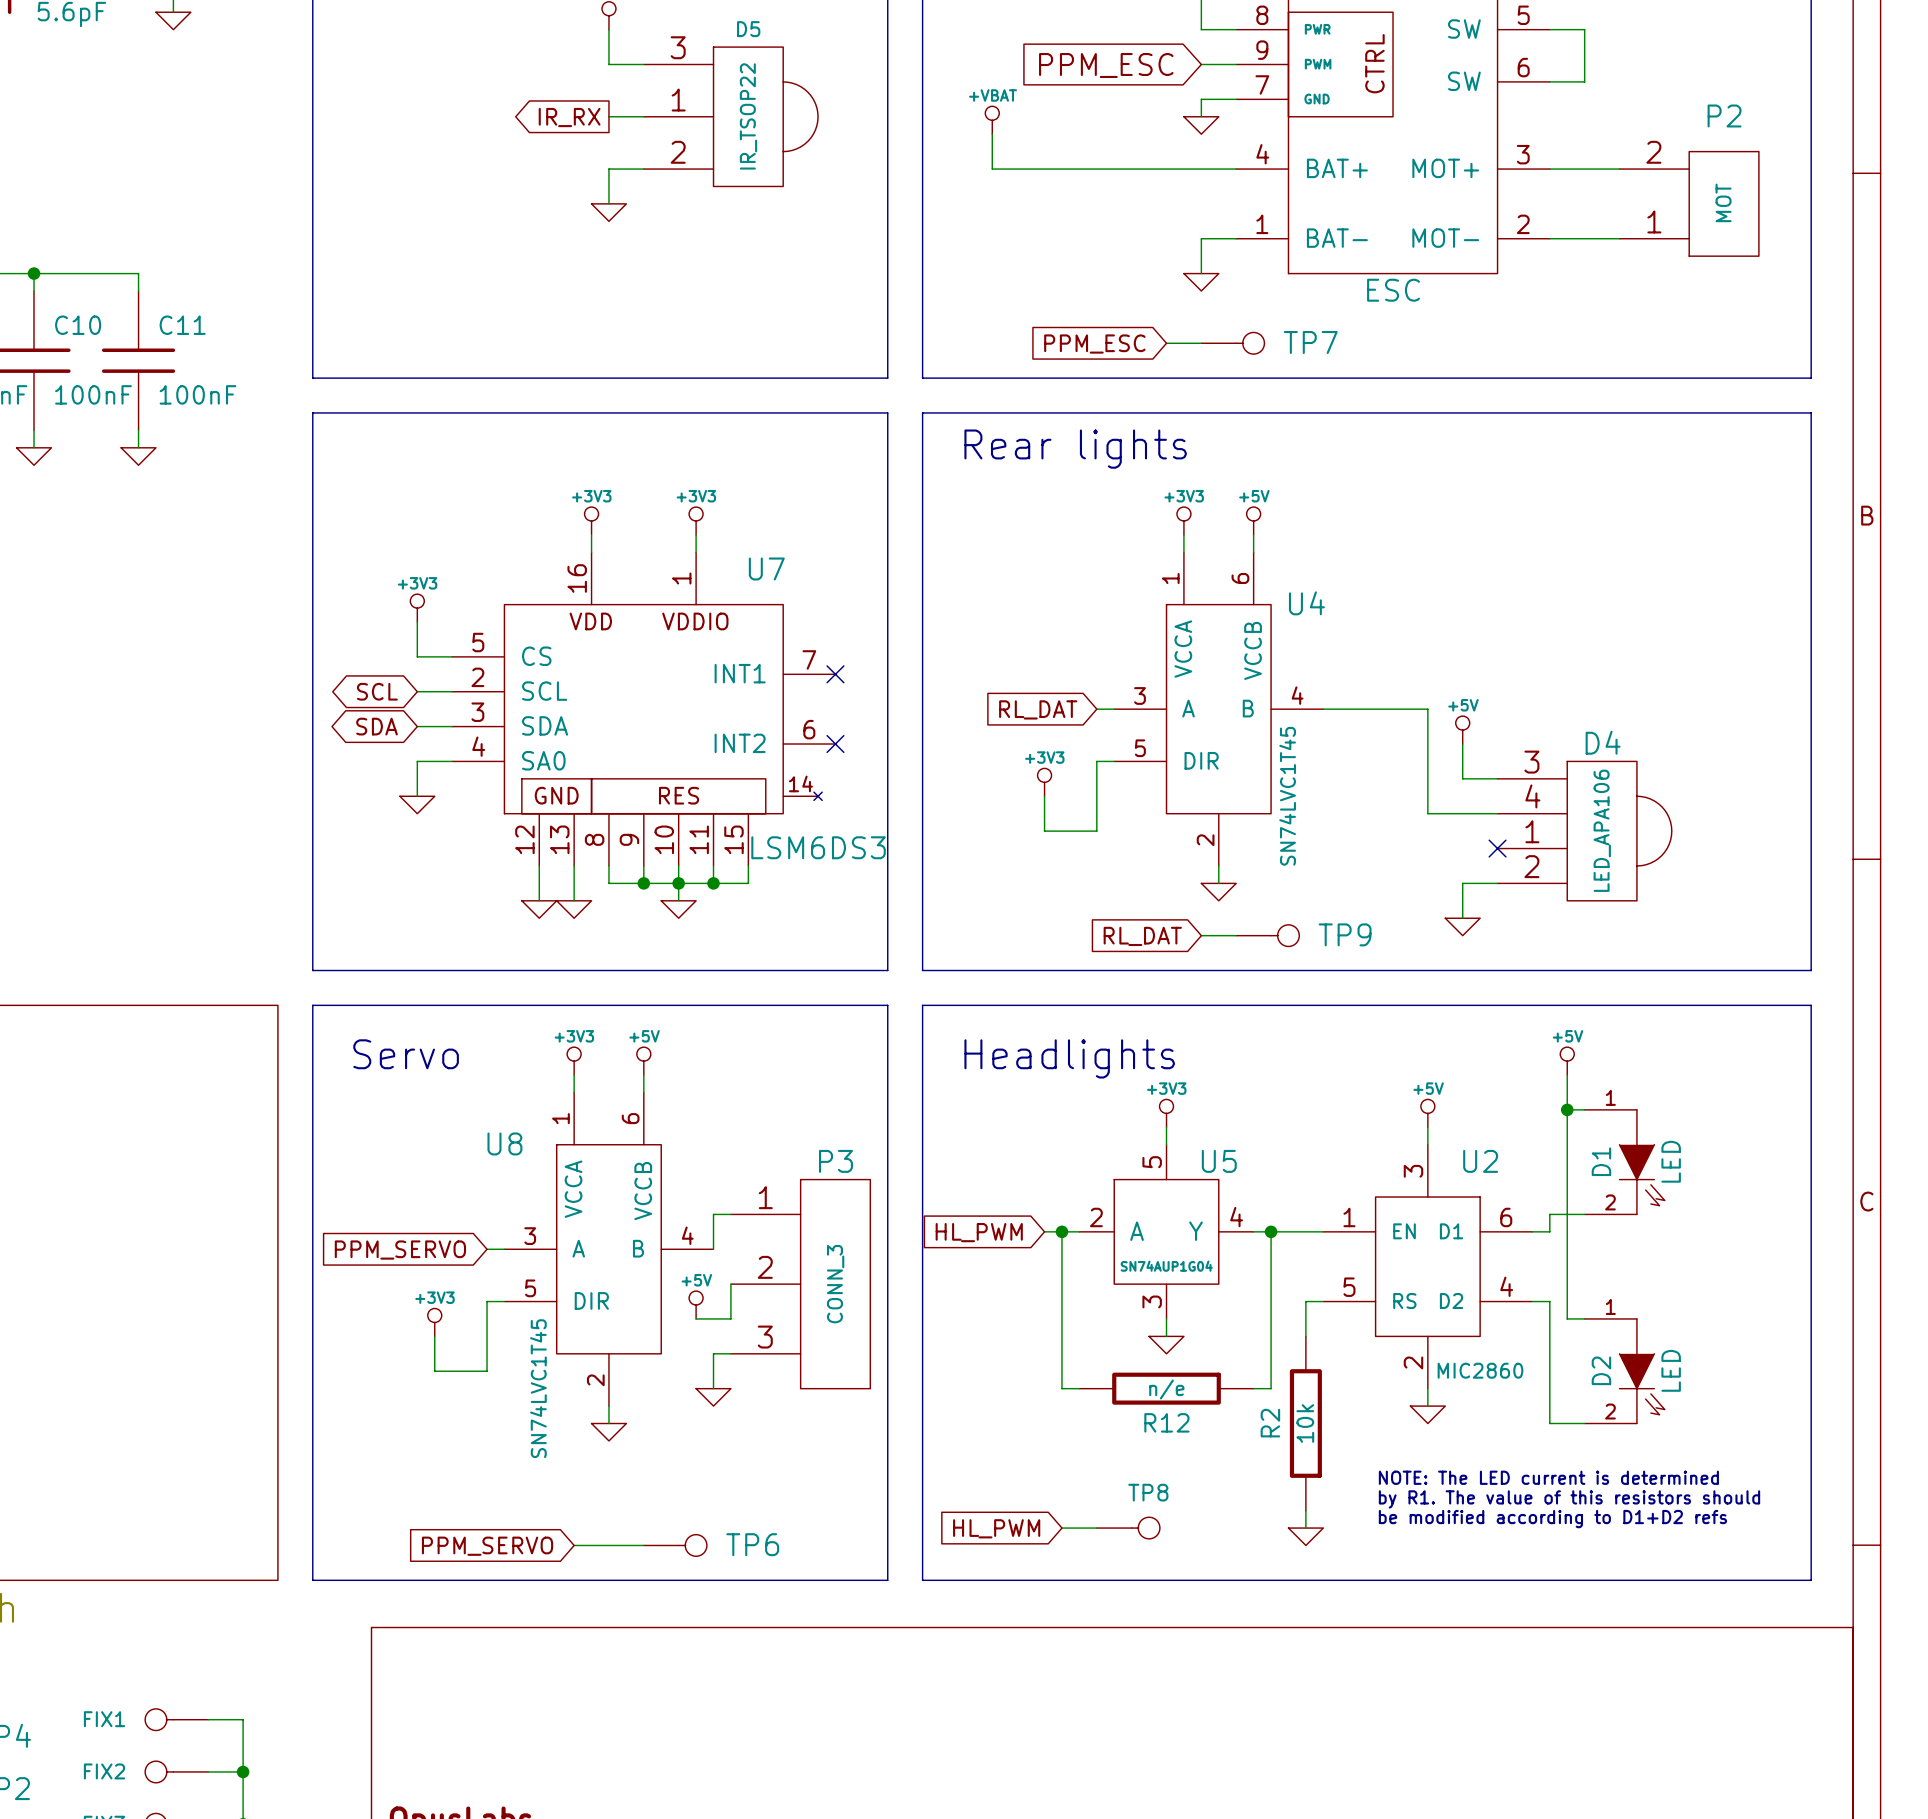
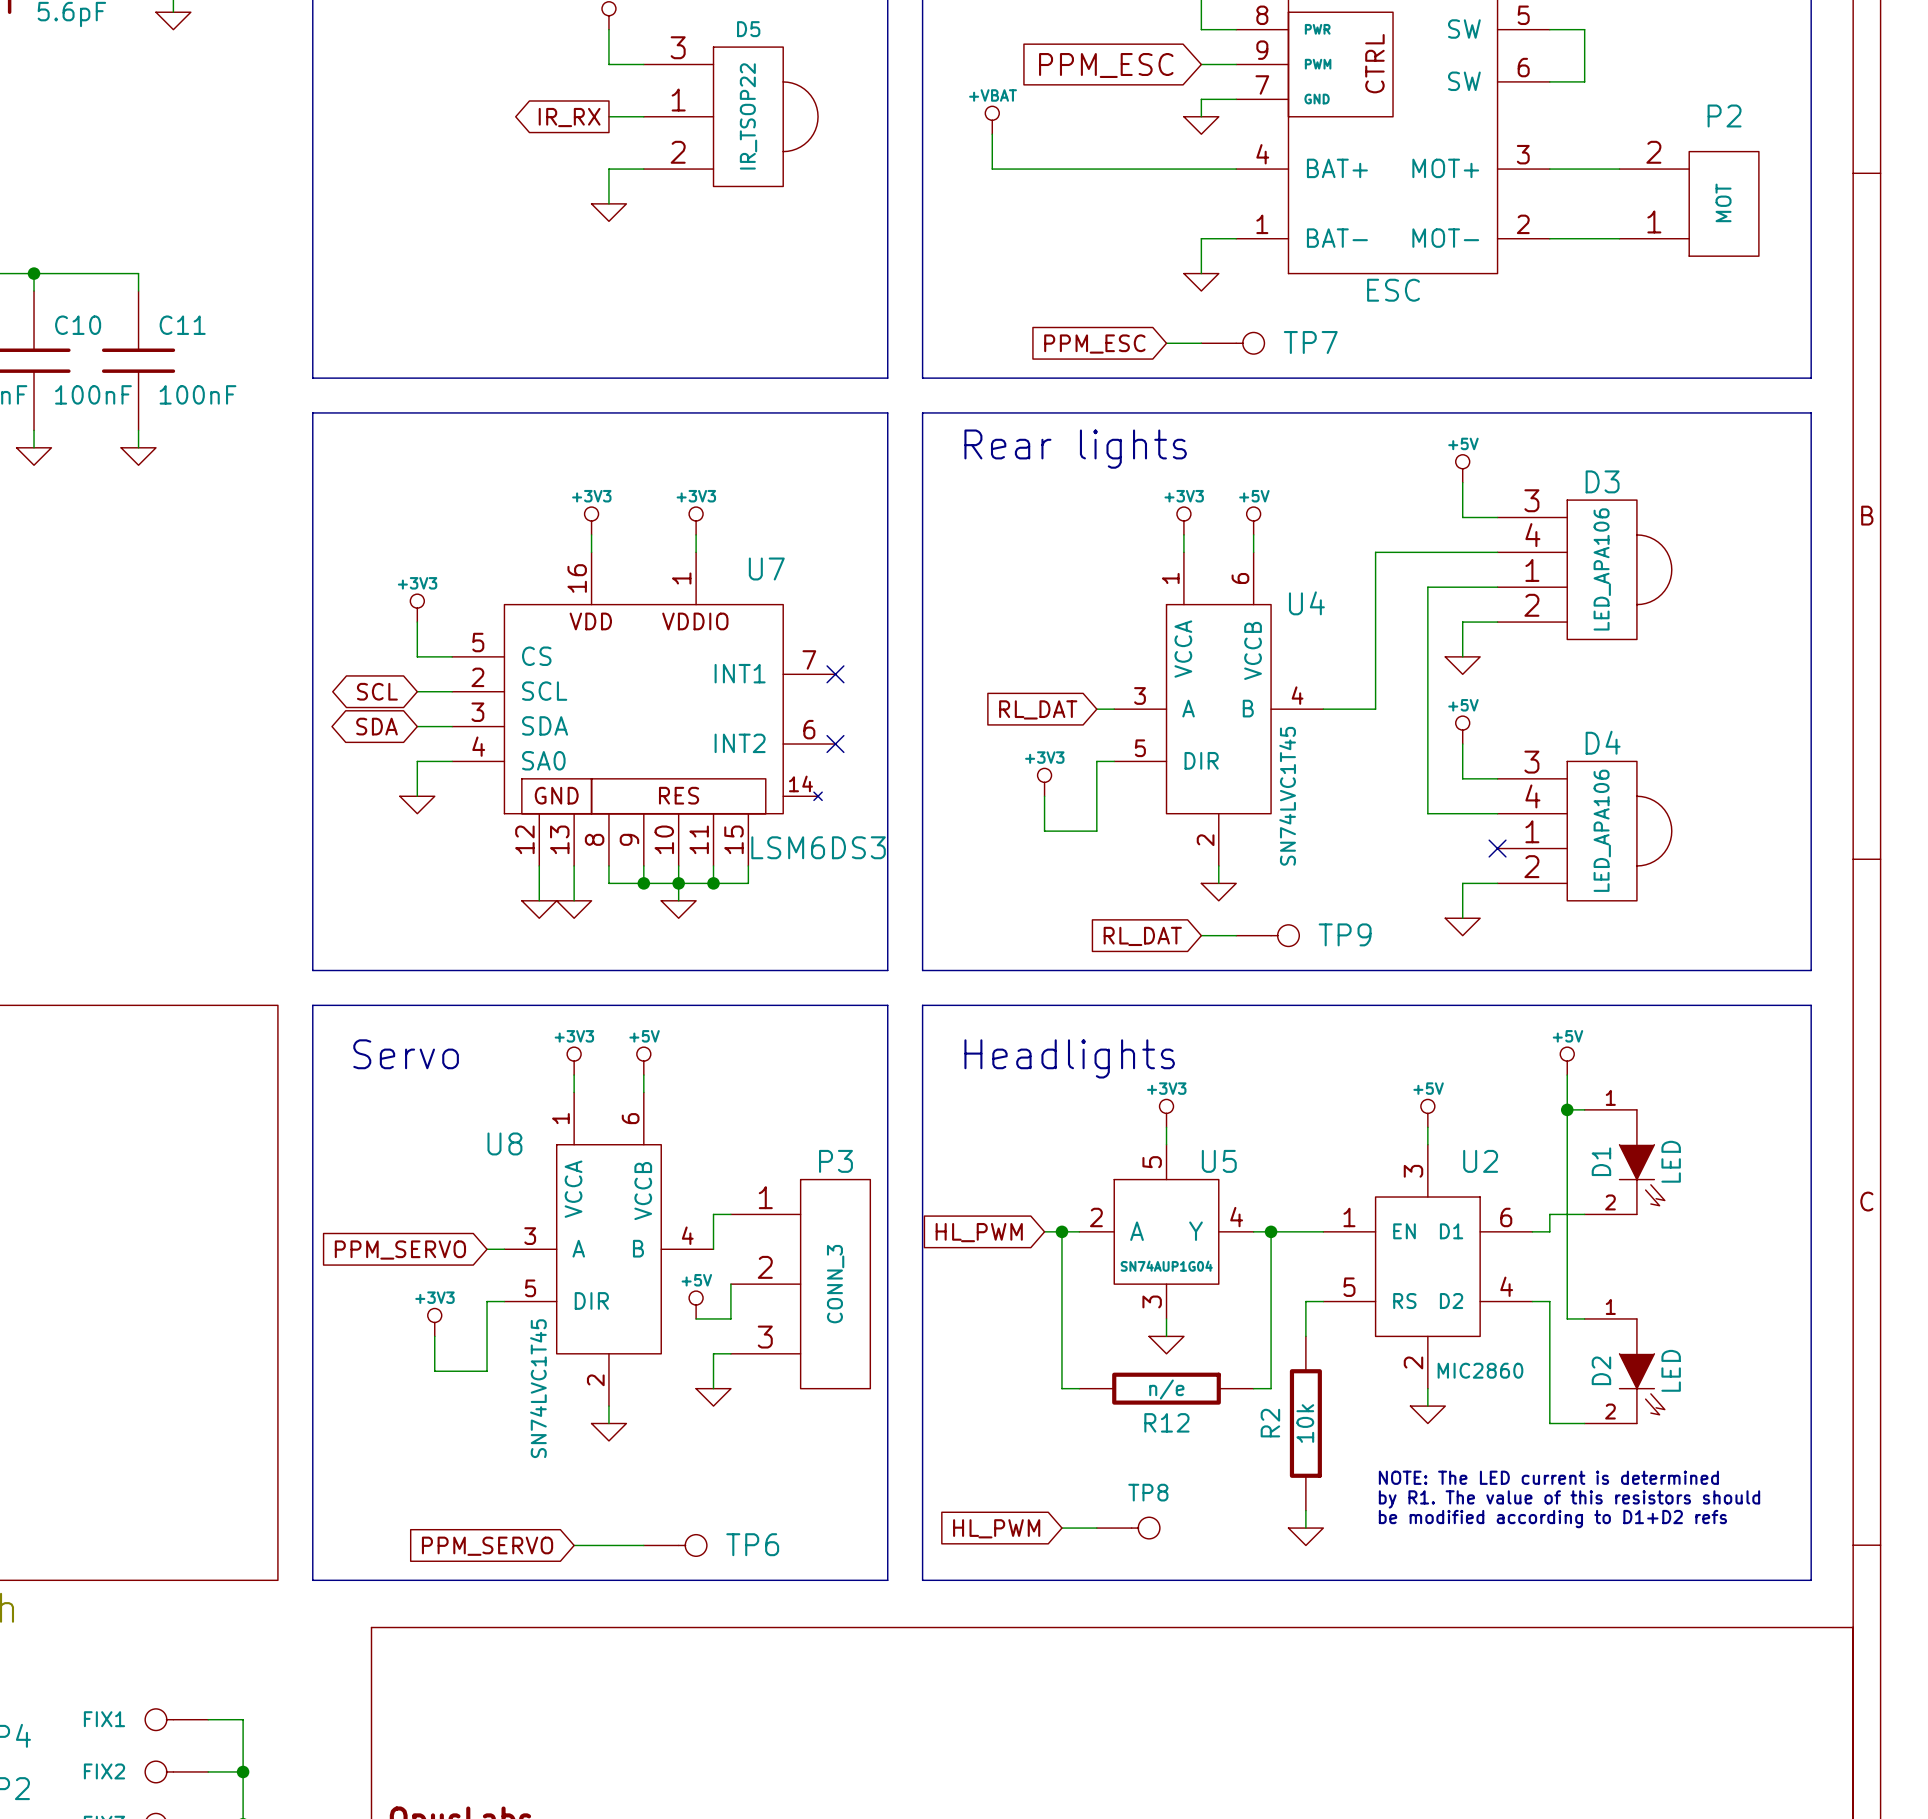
power symbol: none -> +5V (1462, 468)
wire: none -> (1462, 482) (1462, 517) (1497, 517)
D3: none -> LED_APA106 (1584, 569)
wire: none -> (1497, 587) (1427, 587) (1427, 709)
wire: none -> (1497, 622) (1462, 622) (1462, 656)
power symbol: none -> (1462, 665)
wire: (1375, 709) (1427, 709) -> (1375, 709) (1375, 552) (1497, 552)

